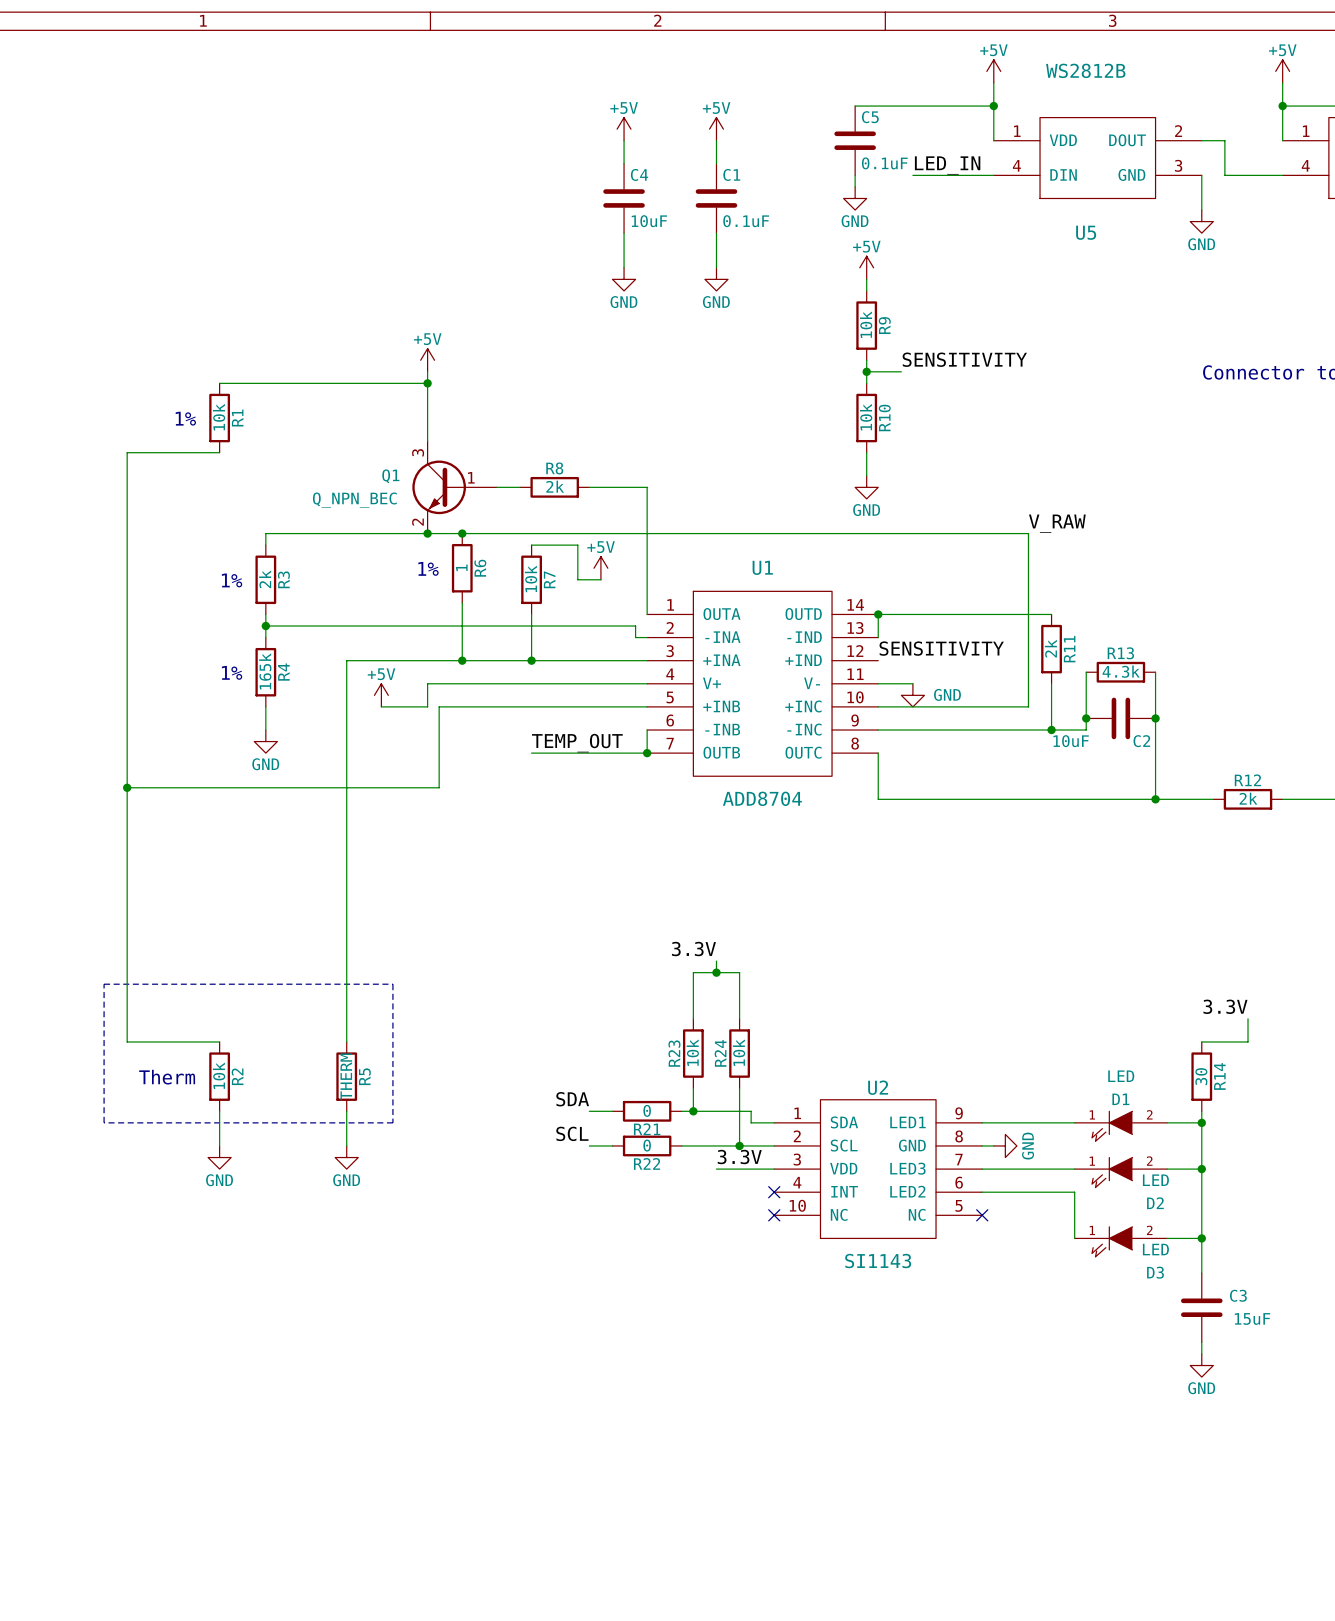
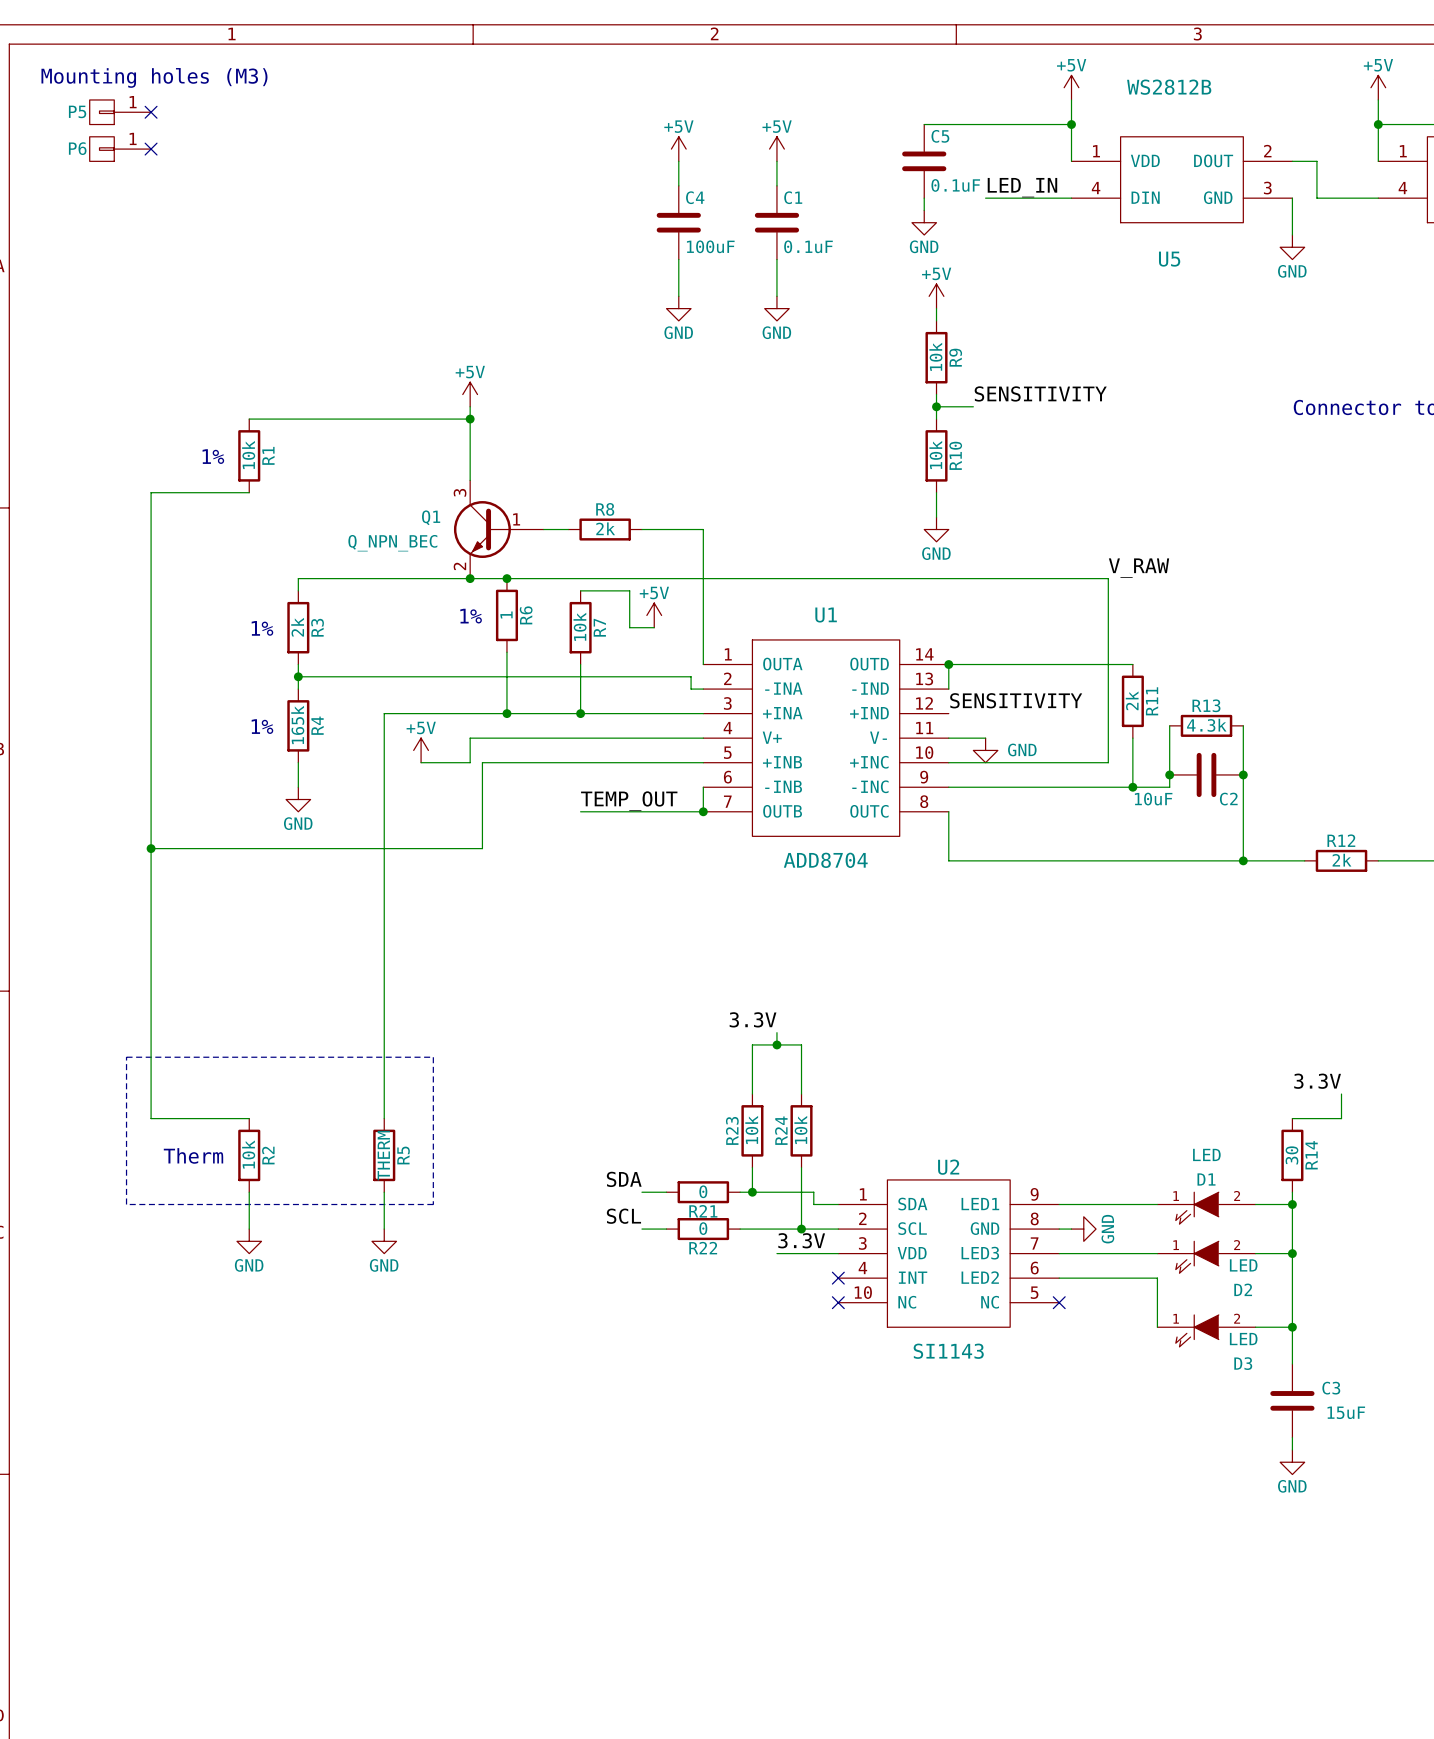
text: none -> Mounting holes (M3) (154, 77)
P5: none -> (120, 112)
no-connect mark: none -> (151, 112)
P6: none -> (120, 149)
no-connect mark: none -> (151, 149)
C4 value: 10uF (649, 221) -> 100uF (710, 246)

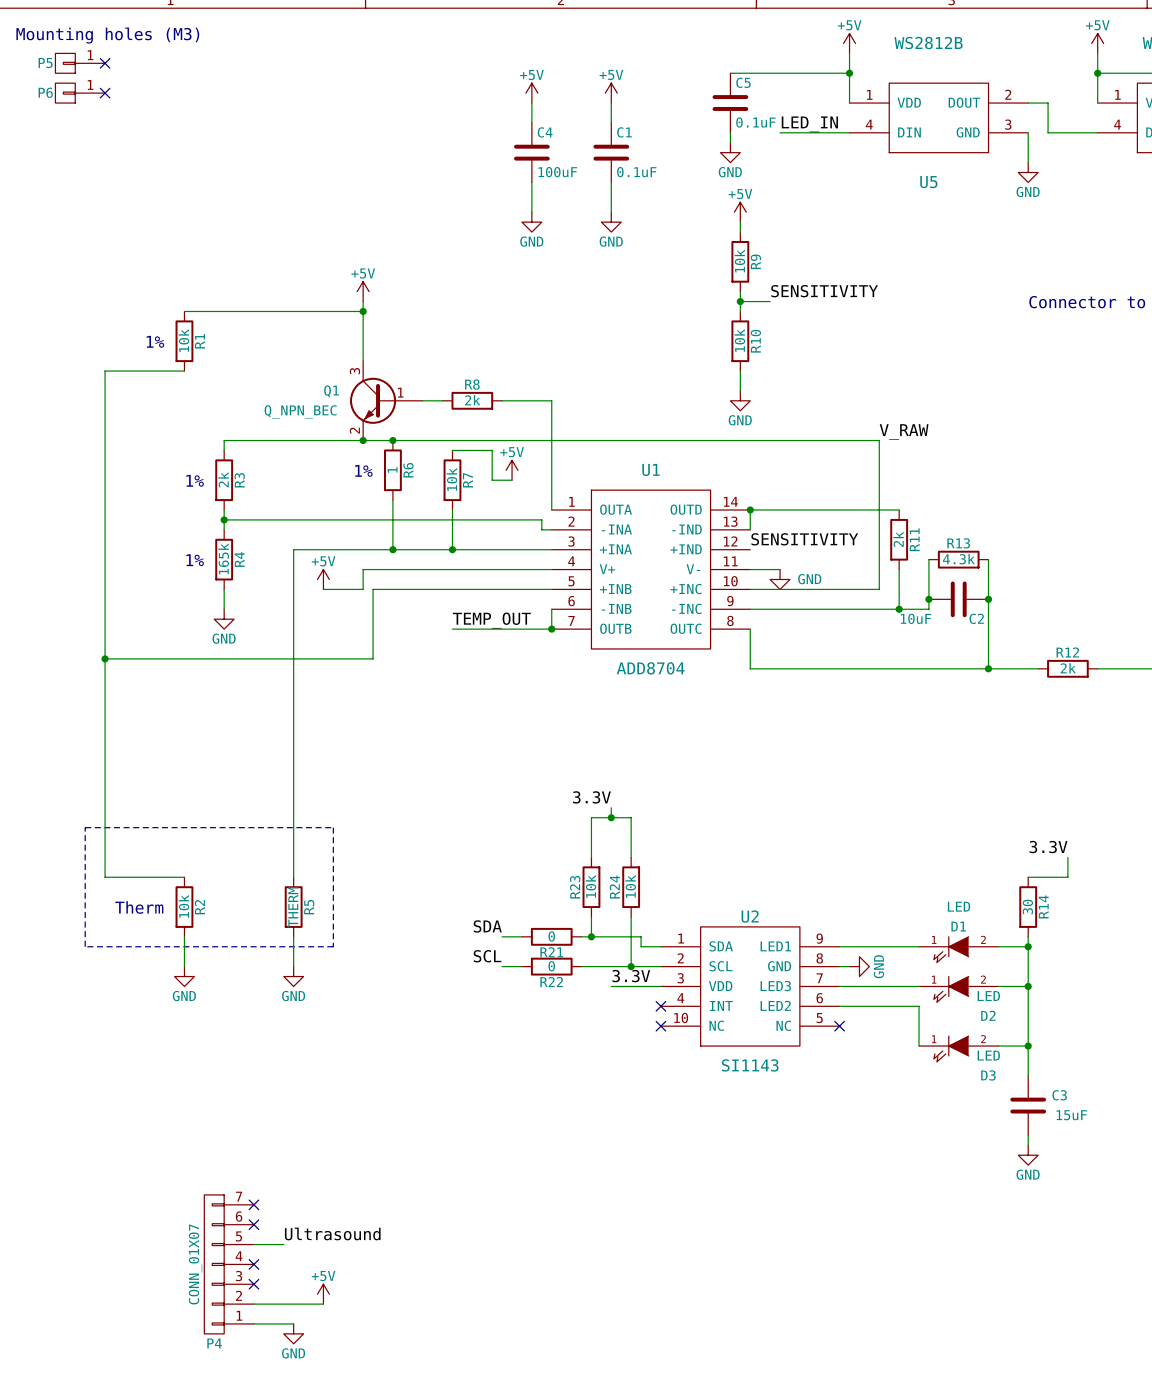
no-connect mark: none -> (253, 1204)
no-connect mark: none -> (253, 1224)
label: none -> Ultrasound (332, 1233)
wire: none -> (253, 1244) (283, 1244)
P4: none -> CONN_01X07 (229, 1264)
no-connect mark: none -> (253, 1264)
no-connect mark: none -> (253, 1284)
power symbol: none -> +5V (323, 1294)
wire: none -> (253, 1304) (323, 1304)
wire: none -> (253, 1323) (293, 1323)
power symbol: none -> GND (293, 1333)

